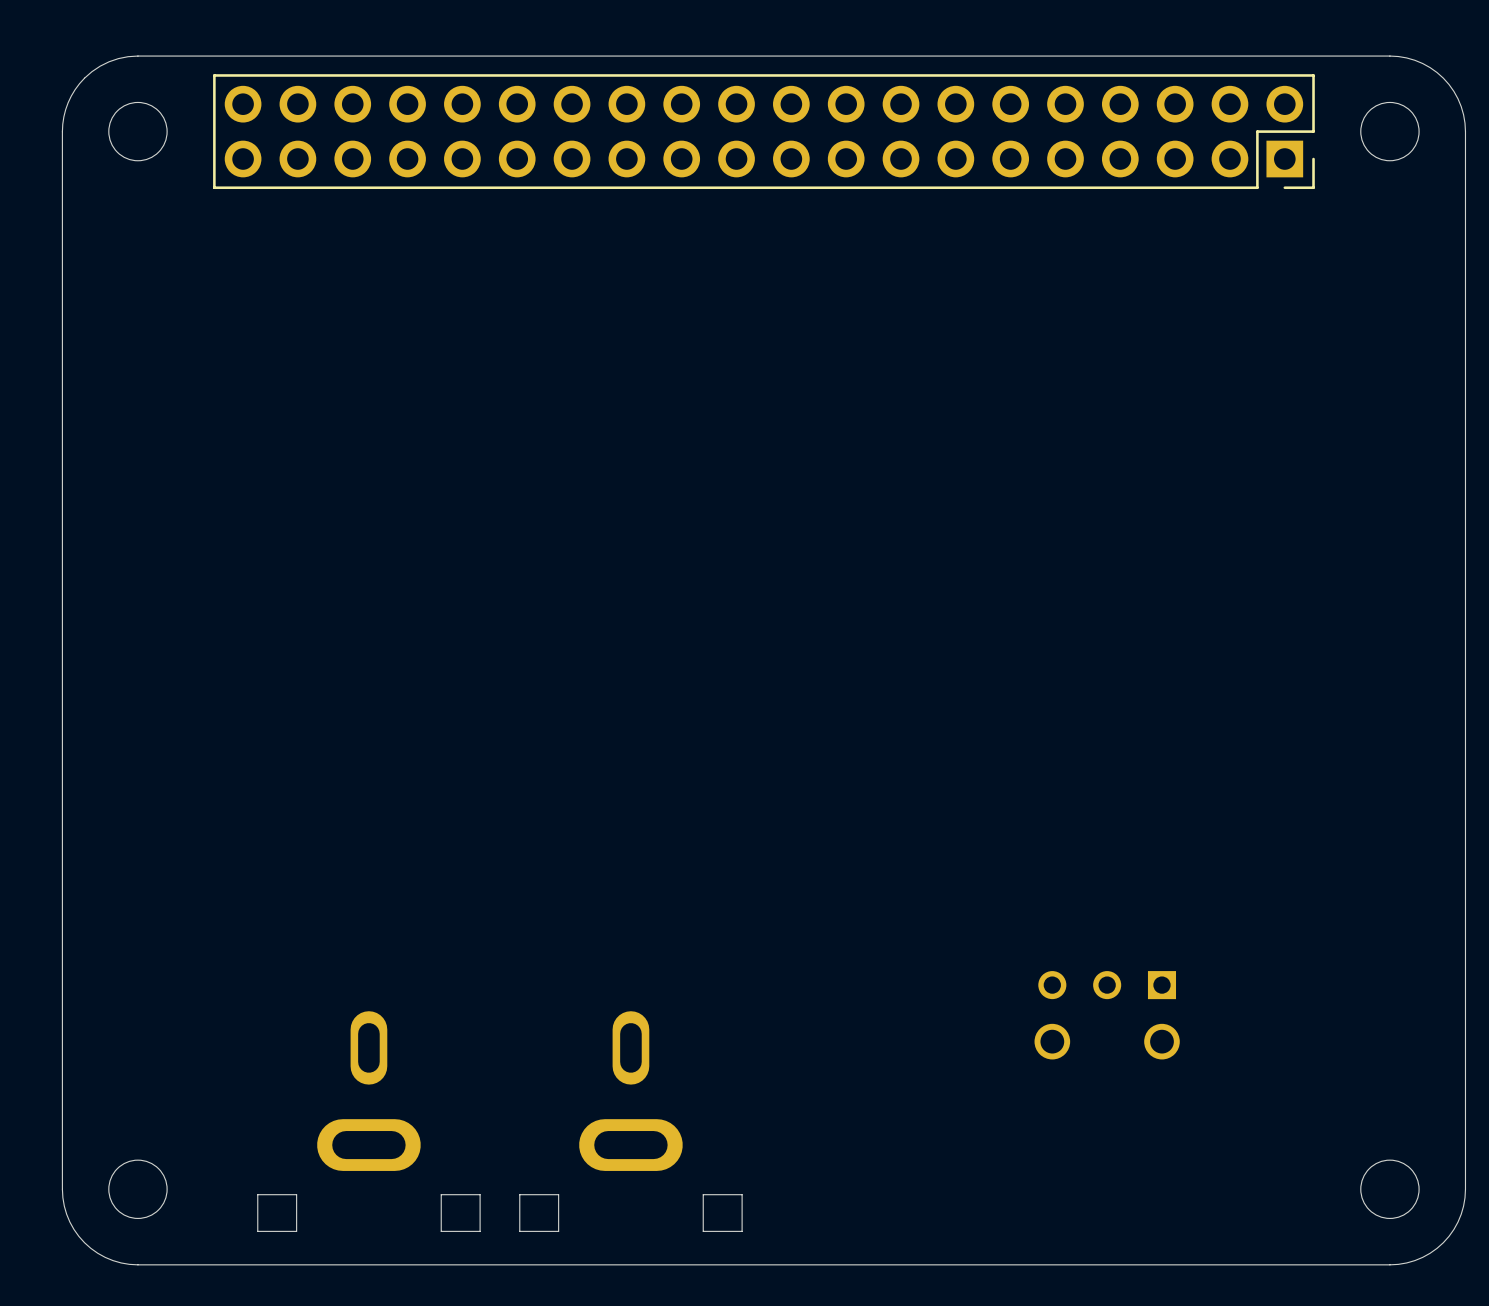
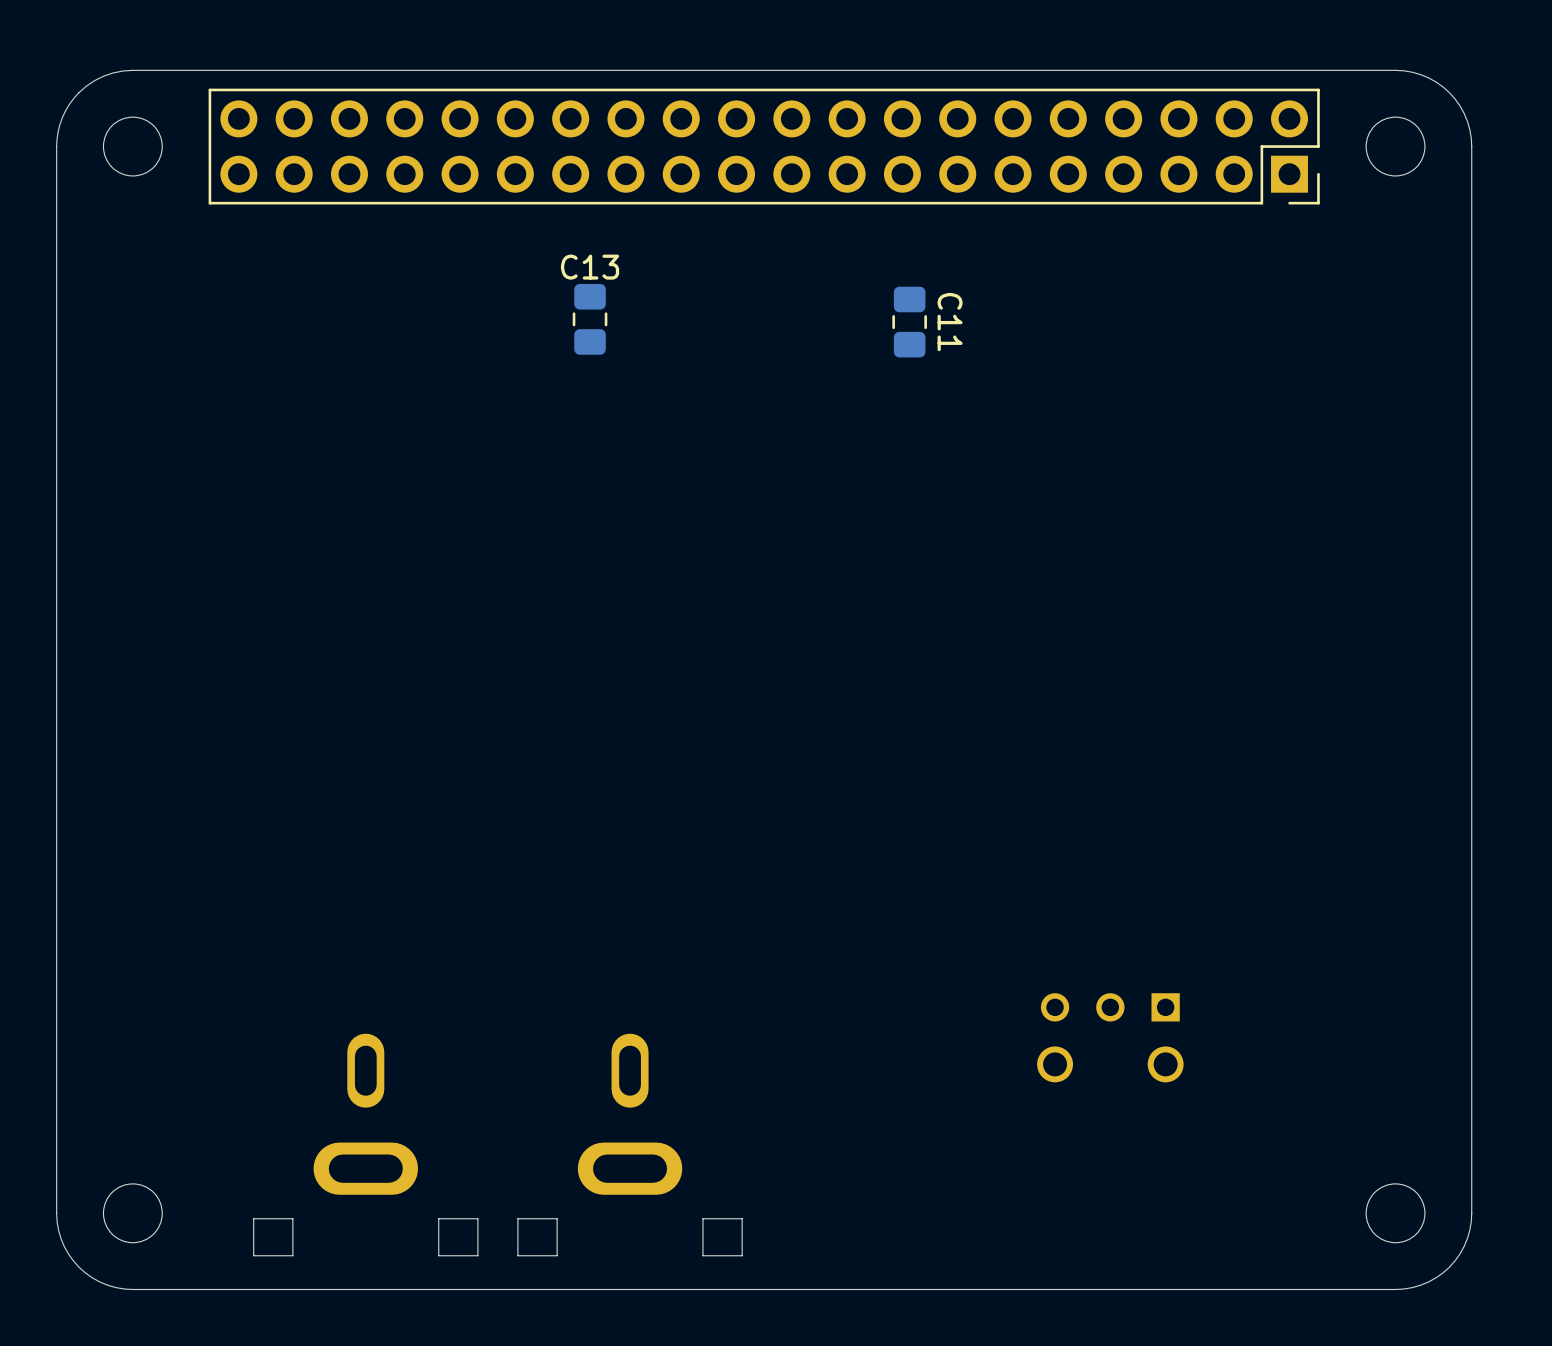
C13: none -> (590, 319)
C11: none -> (909, 322)

